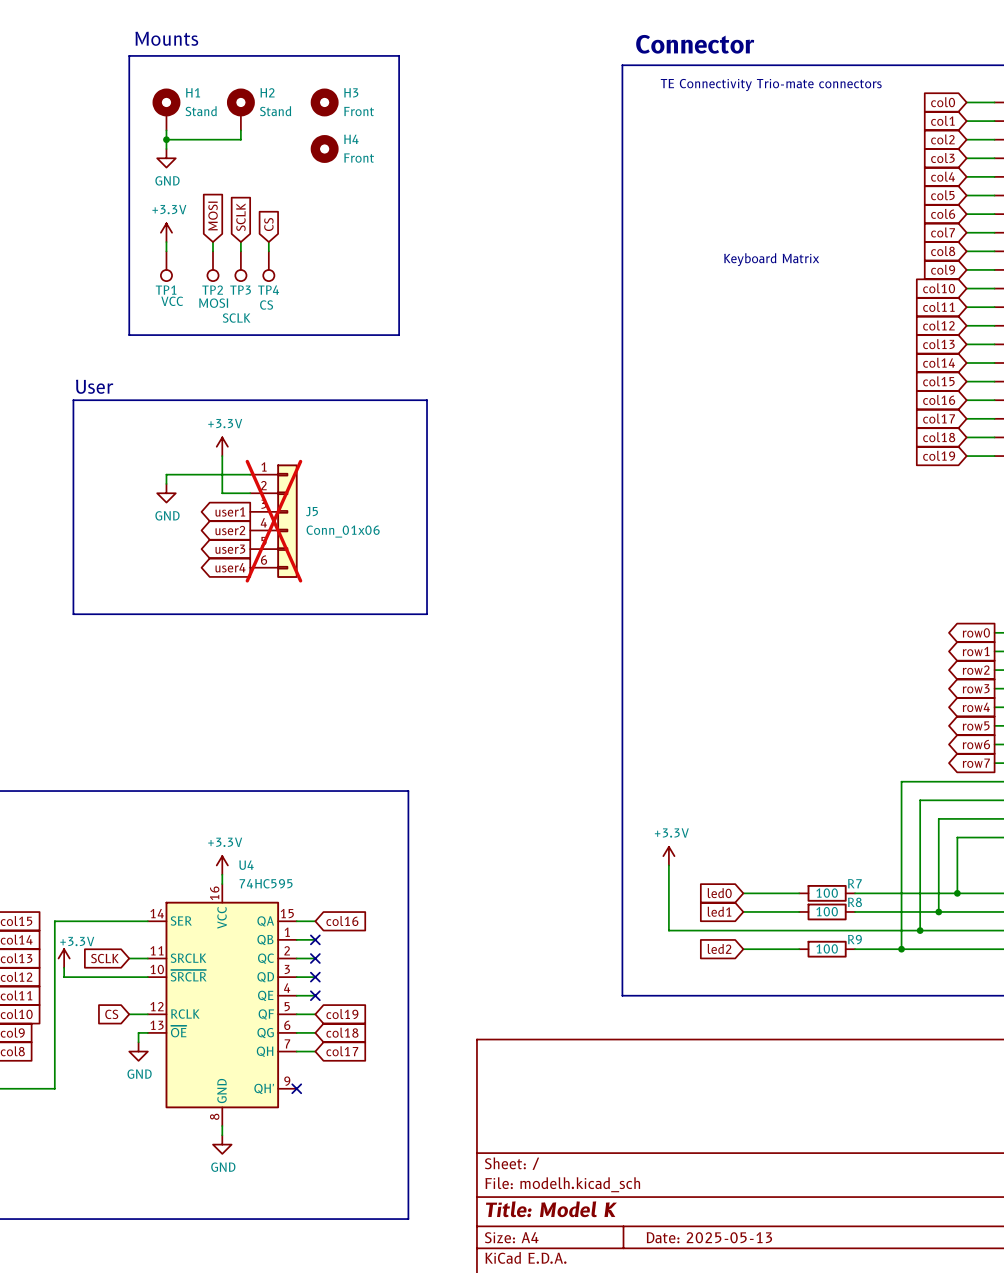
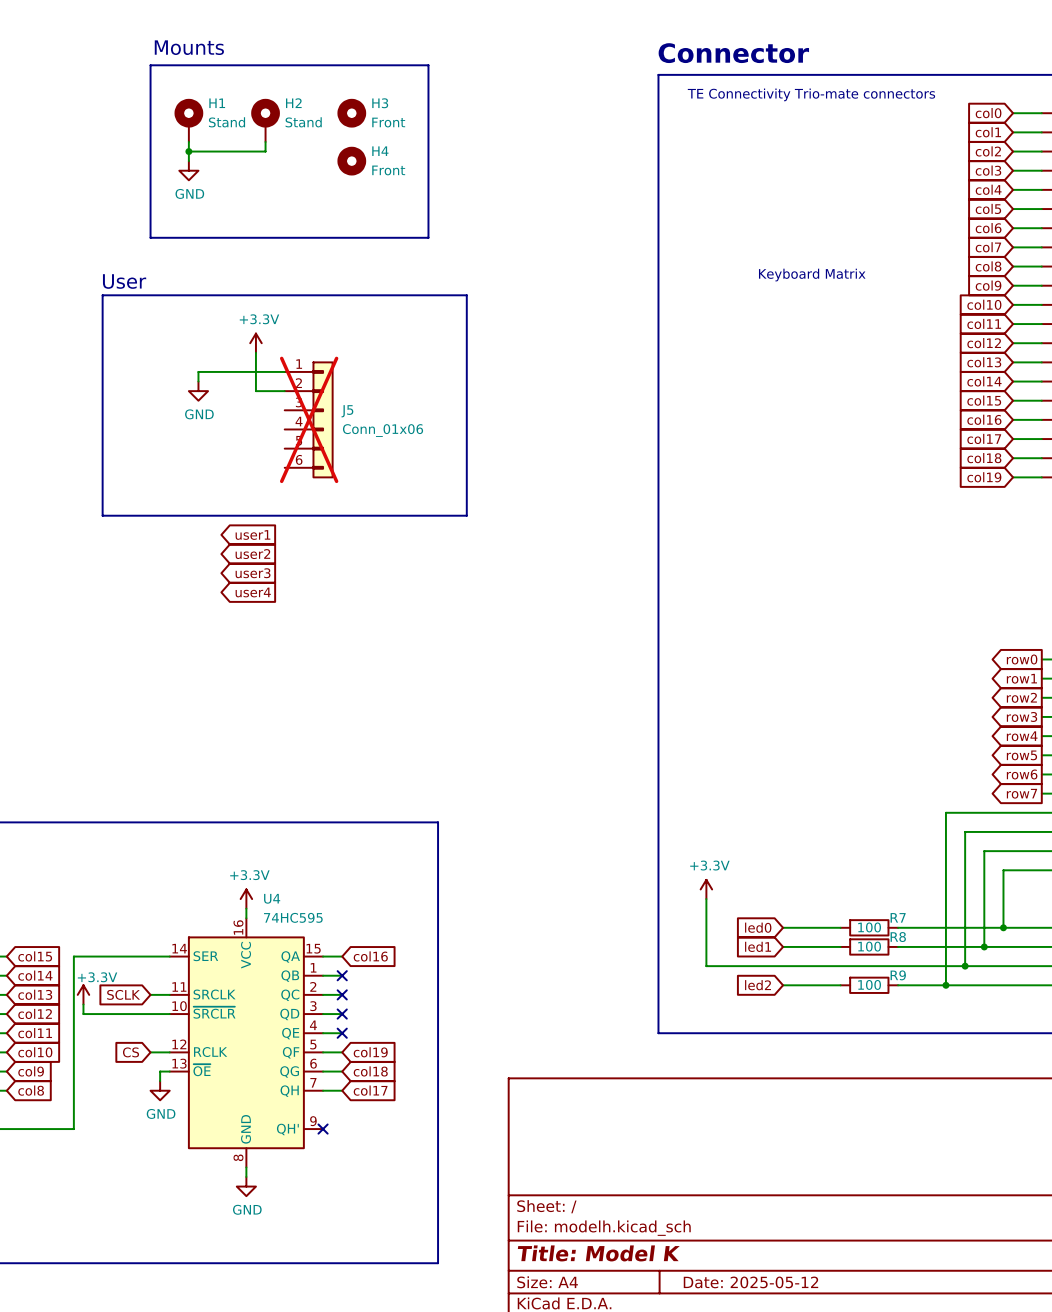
global label: MOSI (213, 216) -> none
global label: SCLK (240, 217) -> none
line: (129, 223) (129, 335) (399, 335) (399, 223) -> (150, 237) (428, 237)
global label: CS (268, 224) -> none
power symbol: +3.3V (166, 232) -> none
wire: (166, 242) (166, 251) -> none
wire: (213, 242) (213, 251) -> none
wire: (240, 242) (240, 251) -> none
wire: (268, 242) (268, 251) -> none
TP1: VCC (166, 266) -> none
TP2: MOSI (213, 266) -> none
TP3: SCLK (240, 266) -> none
TP4: CS (268, 266) -> none
power symbol: none -> +3.3V (255, 343)
text position: User (94, 386) -> User (124, 281)
line: (73, 400) (427, 400) (427, 614) (73, 614) (73, 400) -> (102, 295) (466, 295) (466, 515) (102, 515) (102, 295)
power symbol: +3.3V (222, 446) -> none
wire: (222, 456) (222, 493) (250, 493) -> (255, 352) (255, 391) (284, 391)
wire: (250, 474) (166, 474) (166, 483) -> (284, 371) (198, 371) (198, 381)
power symbol position: GND (166, 493) -> GND (198, 391)
J5 position: (273, 521) -> (309, 419)
title block: Date: 2025-05-13 (709, 1237) -> Date: 2025-05-12 (750, 1282)

